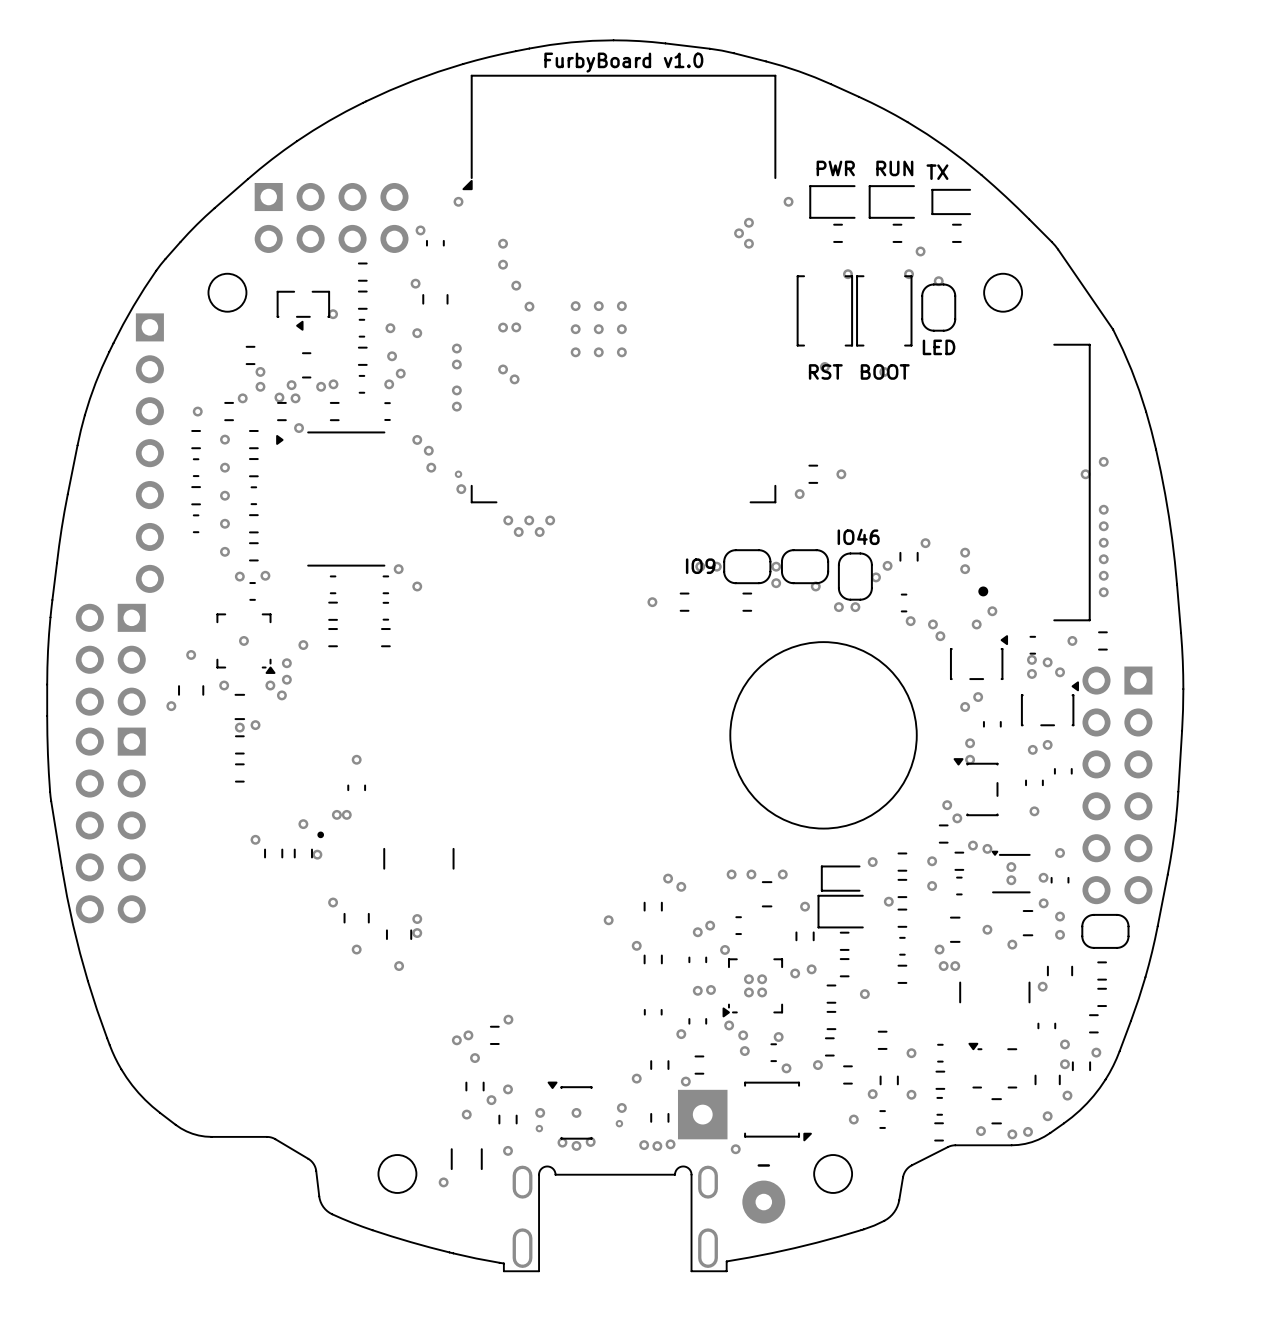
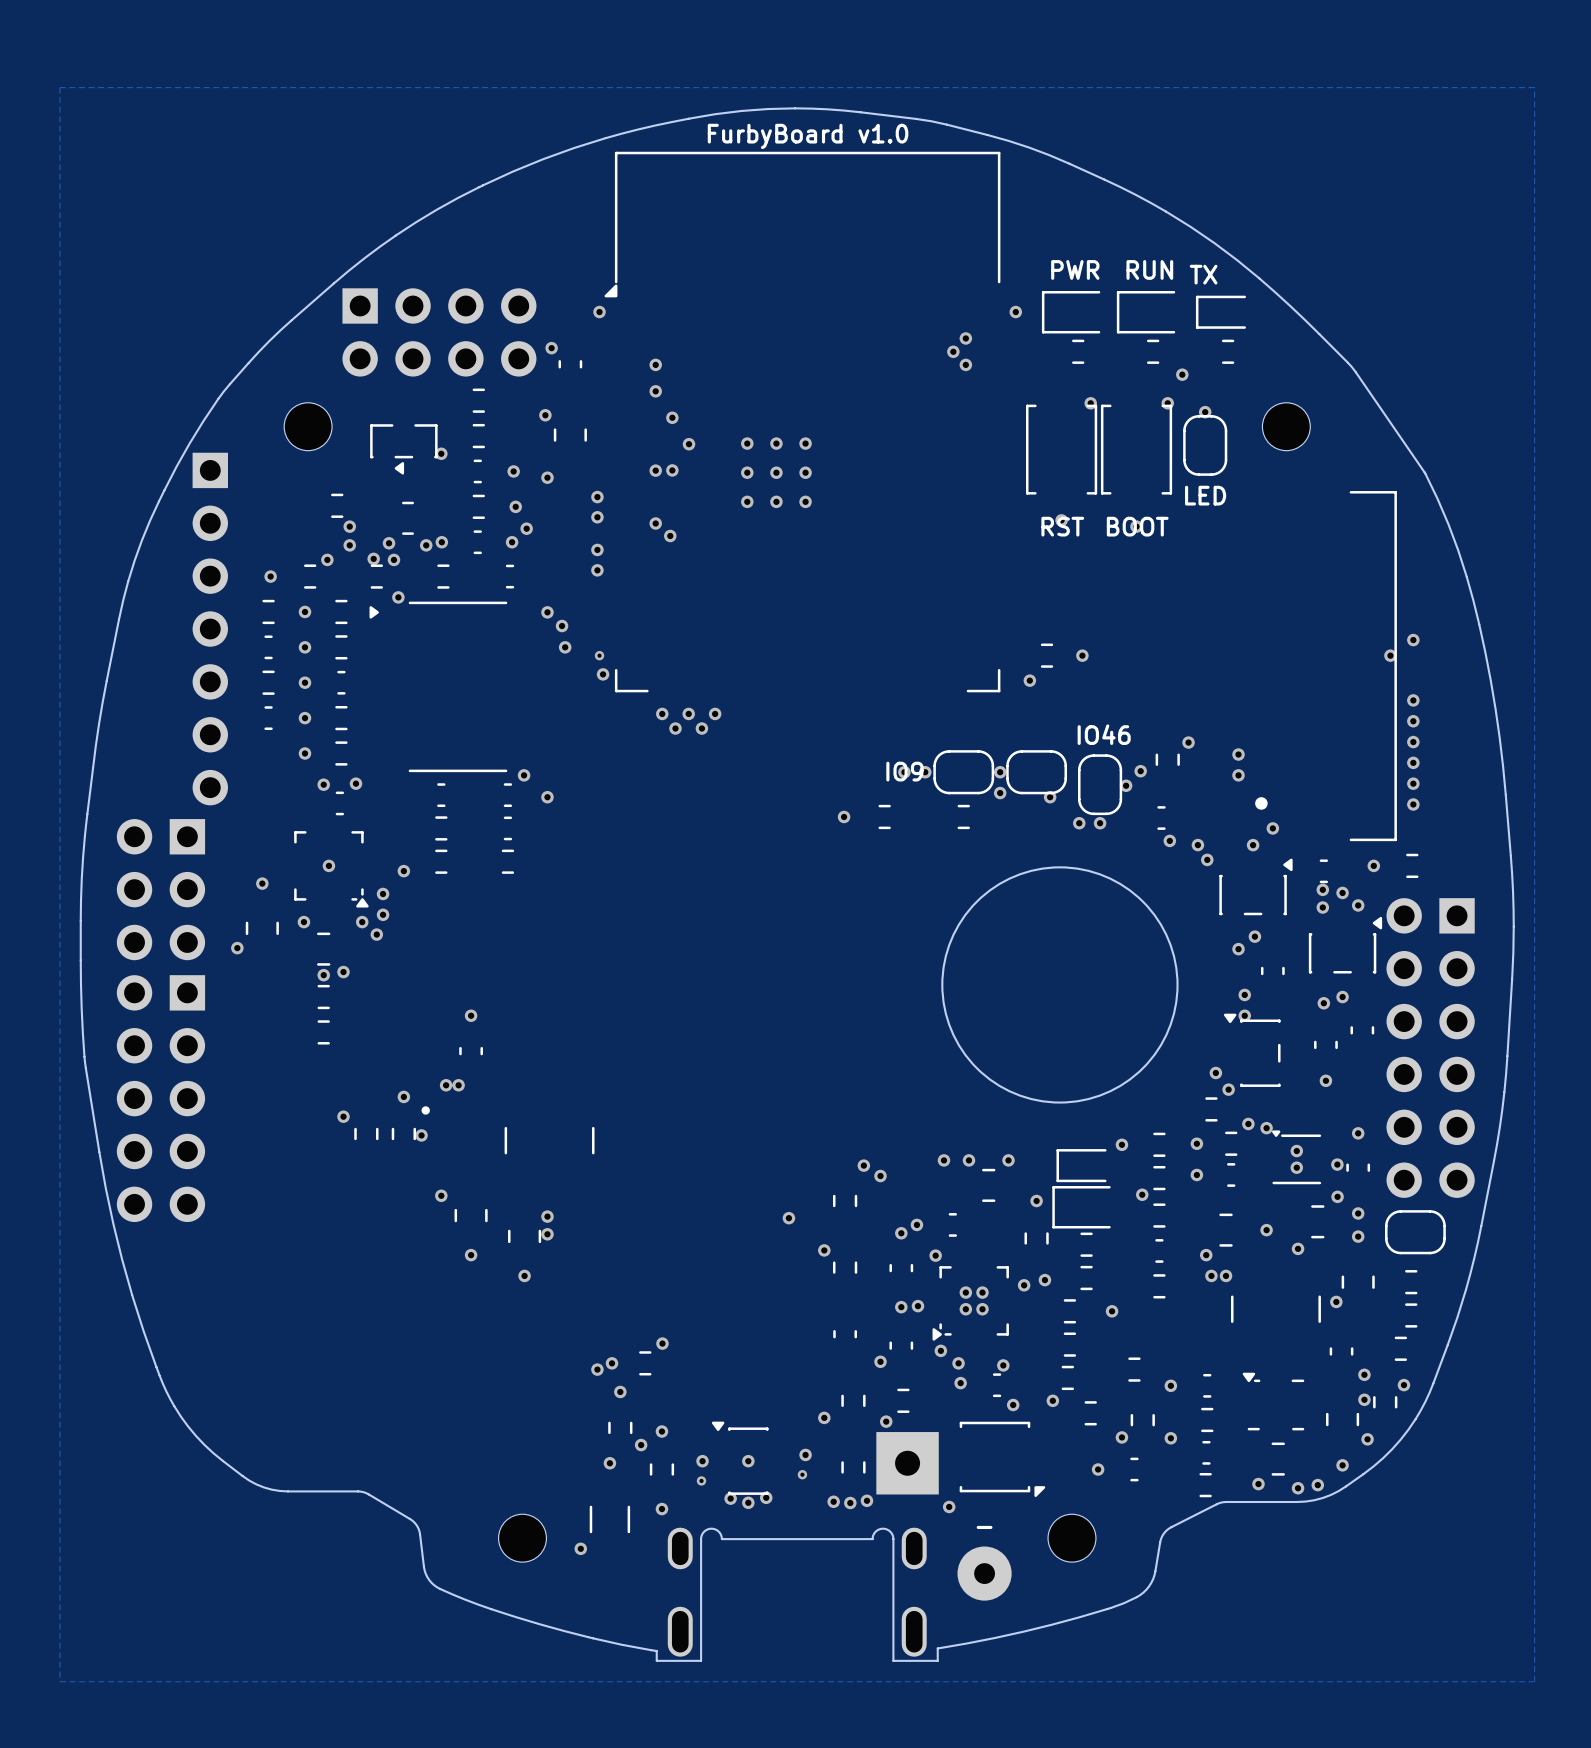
zone outline: none -> (59, 87) (1534, 87) (1534, 1681) (59, 1681) (59, 87)

